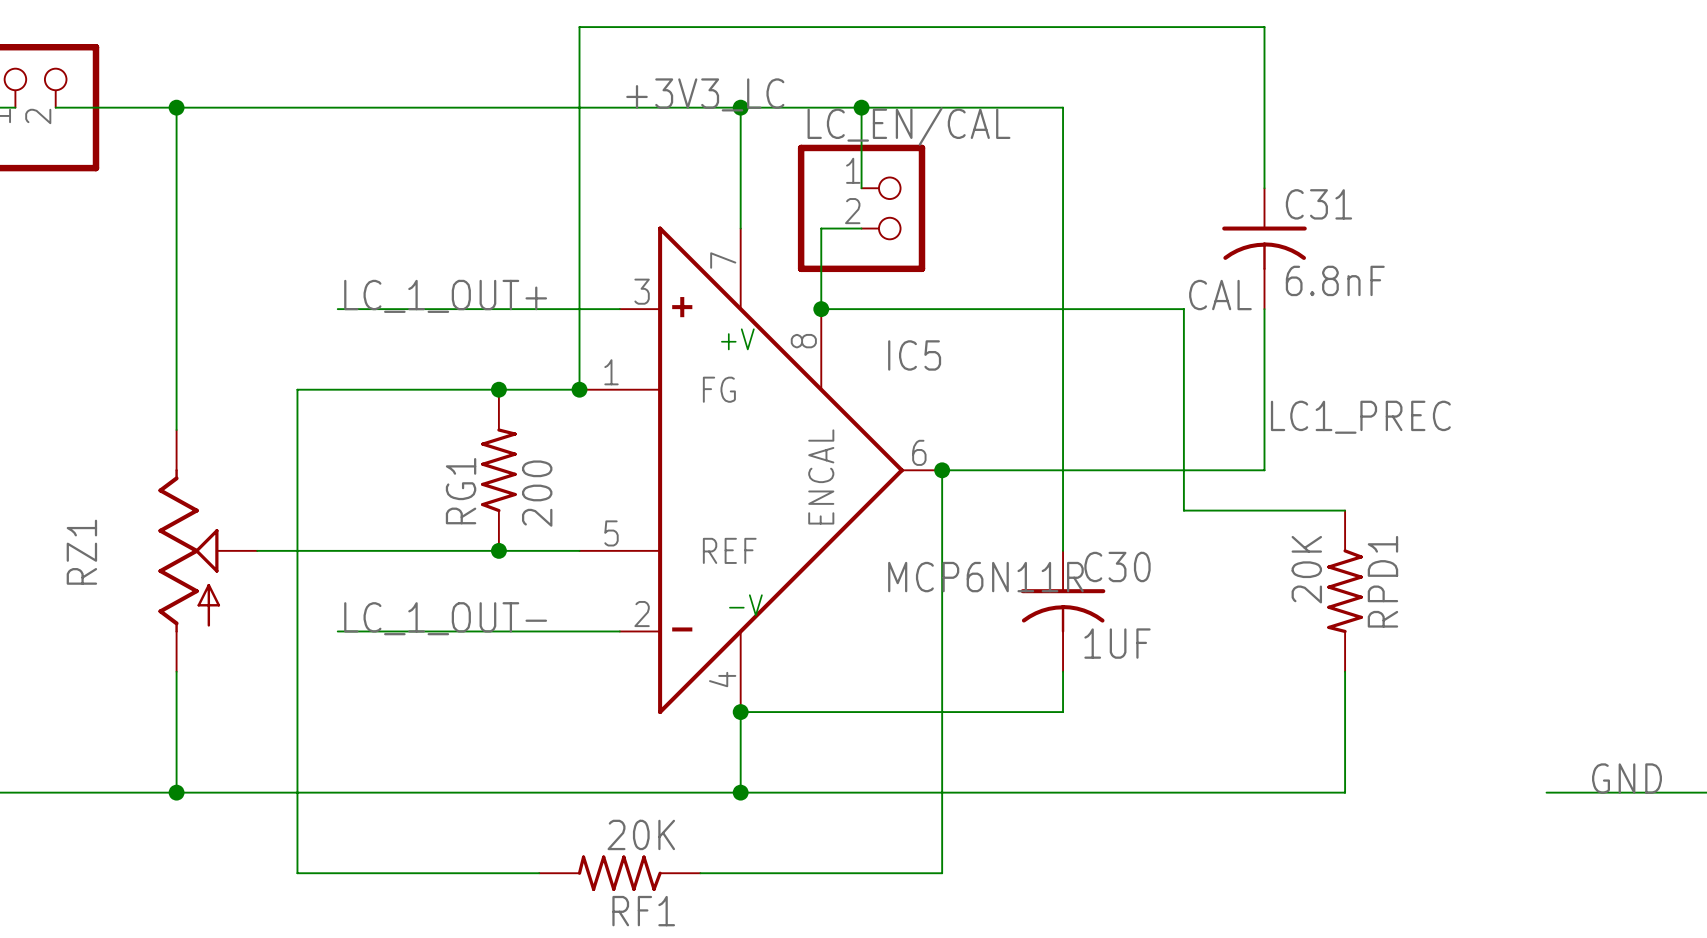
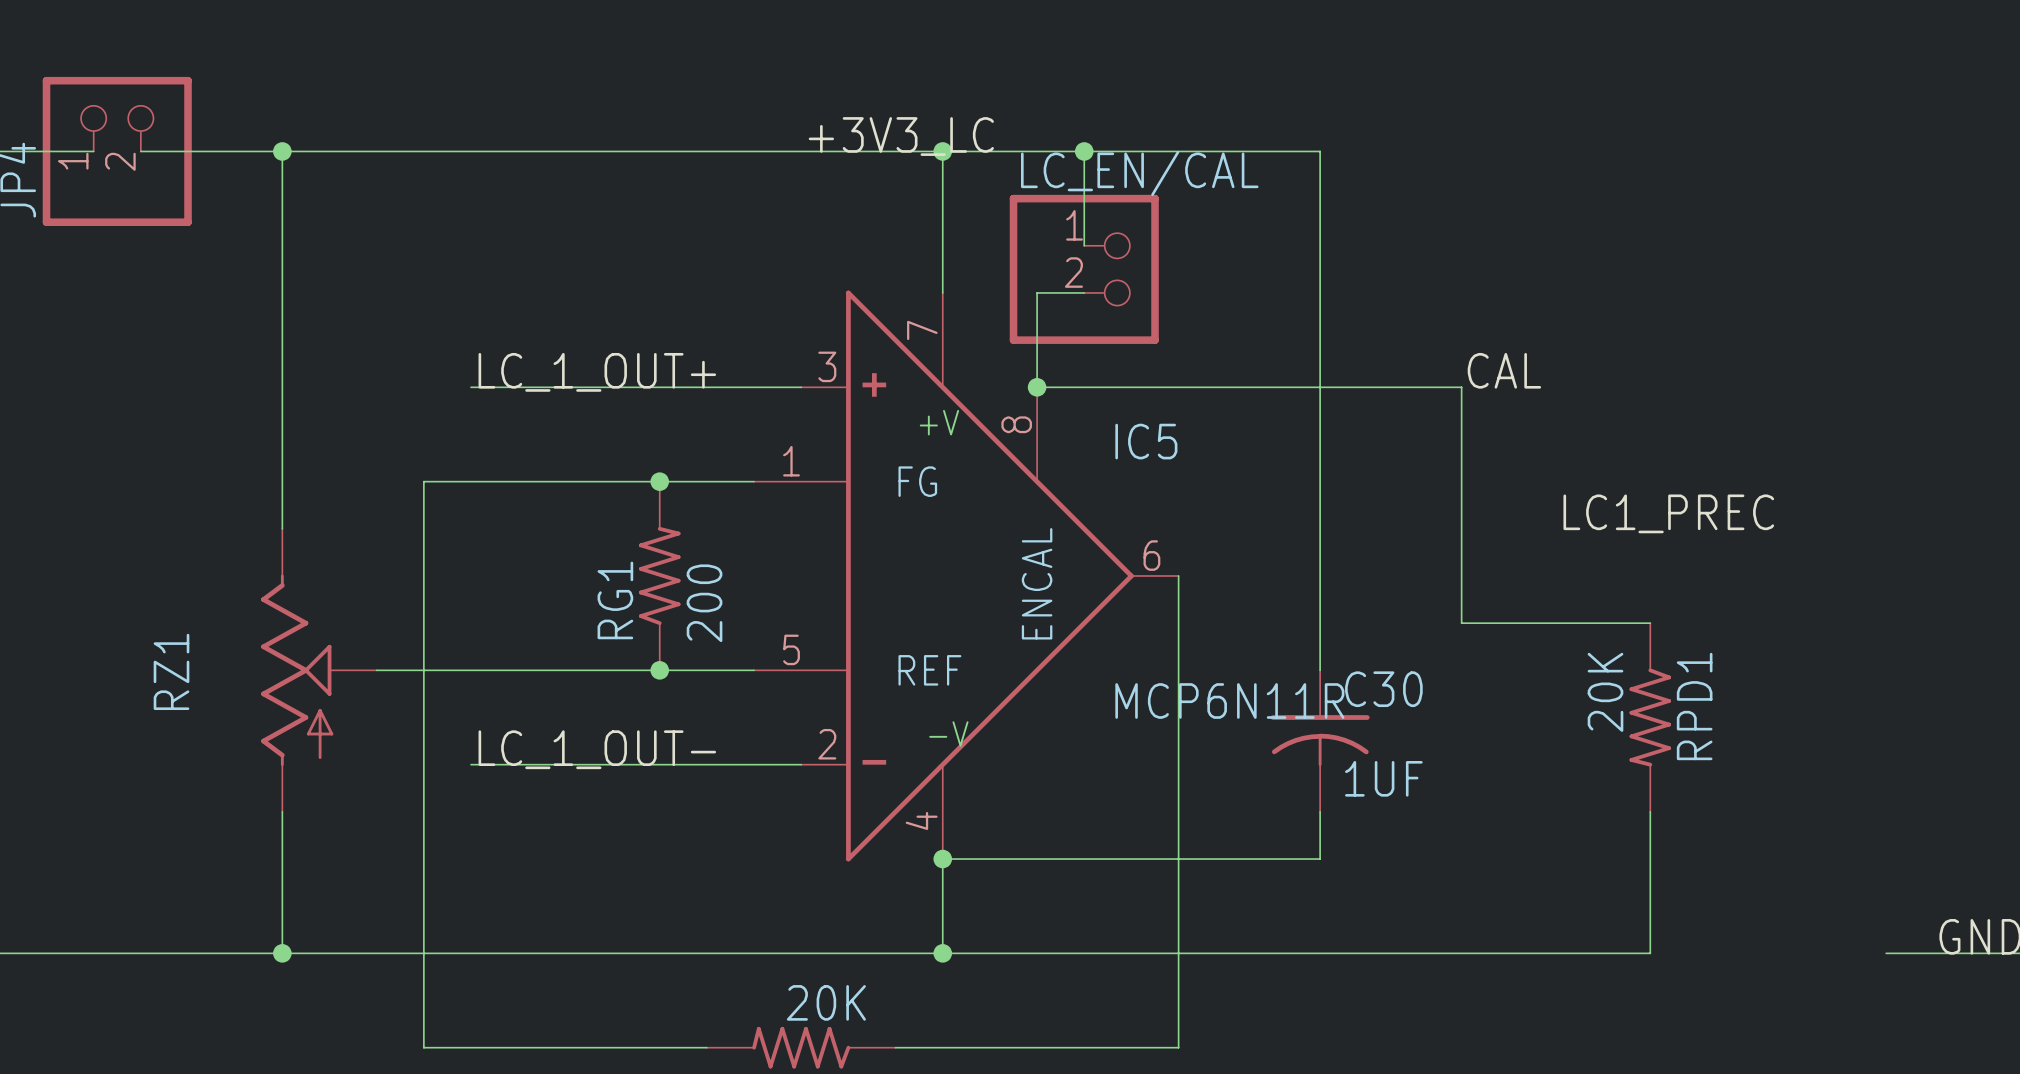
wire: (1264, 188) (1264, 27) (579, 27) (579, 389) -> none
C31: 6.8nF (1264, 248) -> none
wire: (1264, 309) (1264, 470) (942, 470) -> none
junction: (579, 389) -> none
junction: (942, 470) -> none

